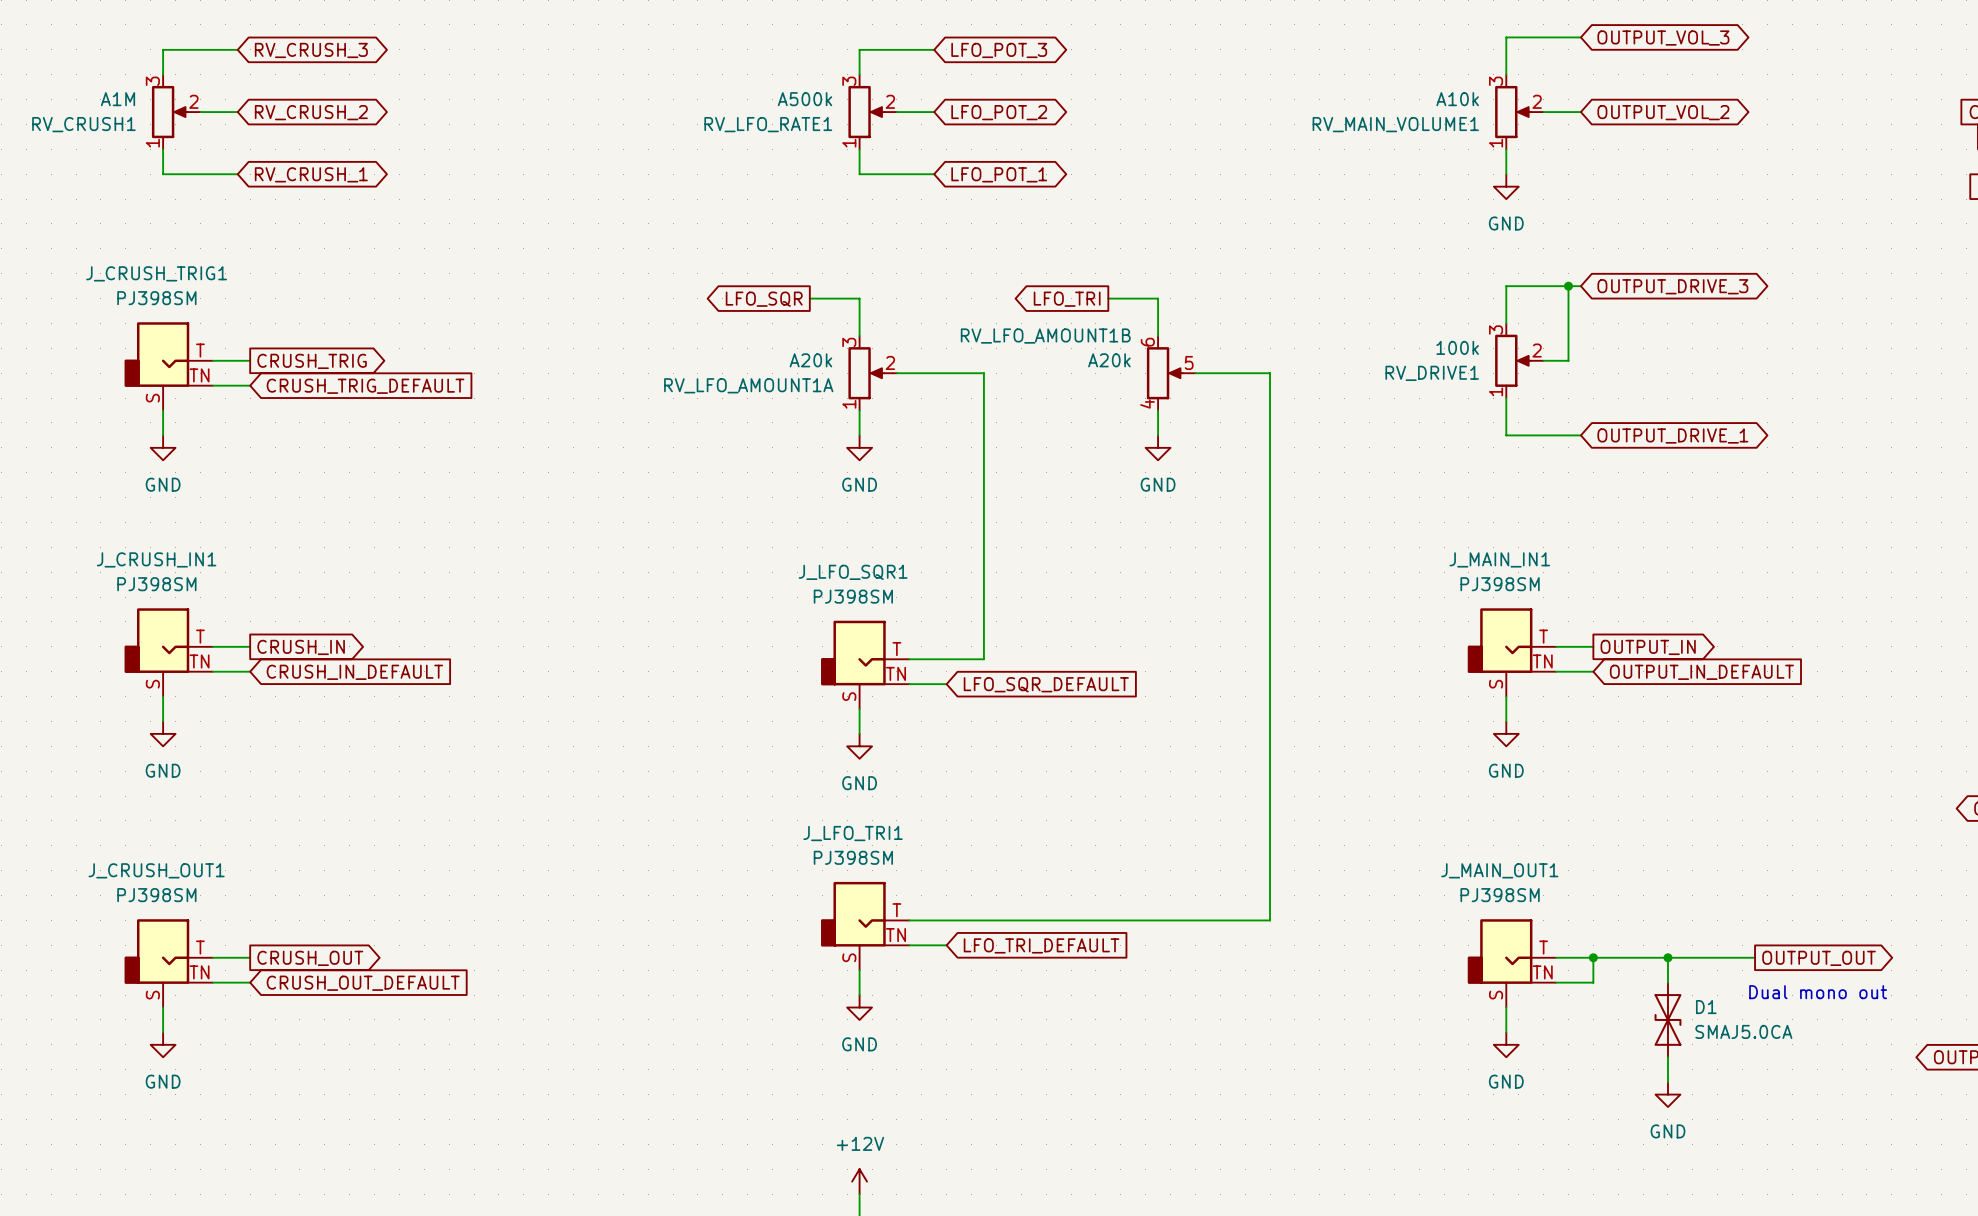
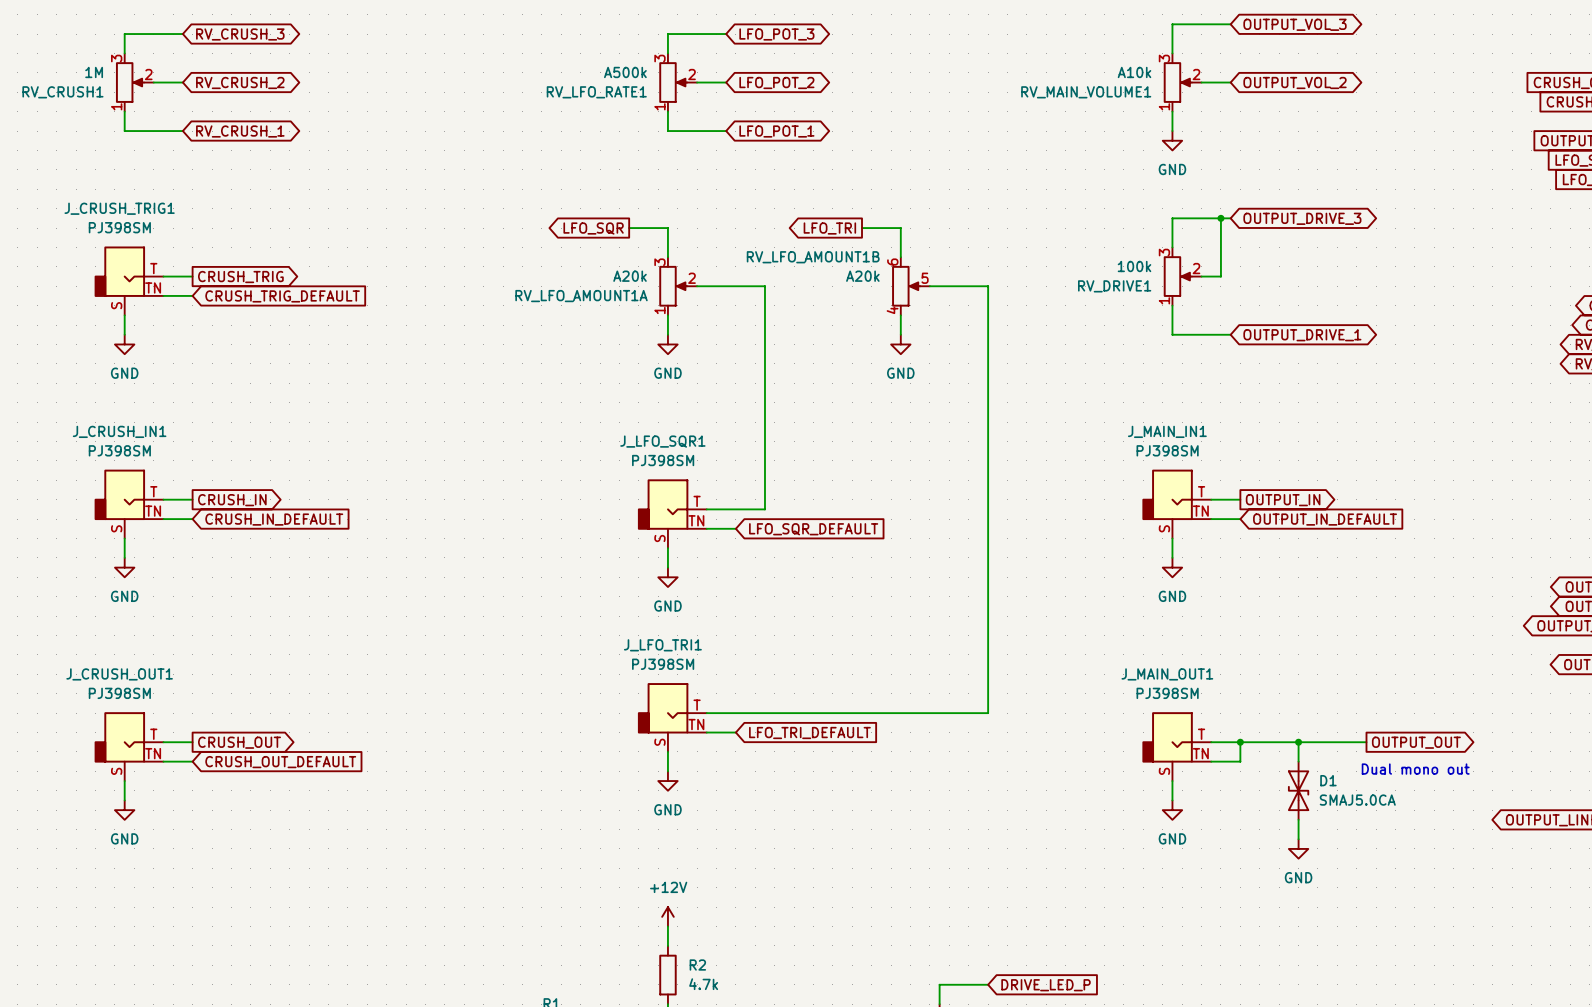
RV_CRUSH1 value: A1M (118, 99) -> 1M (94, 72)

